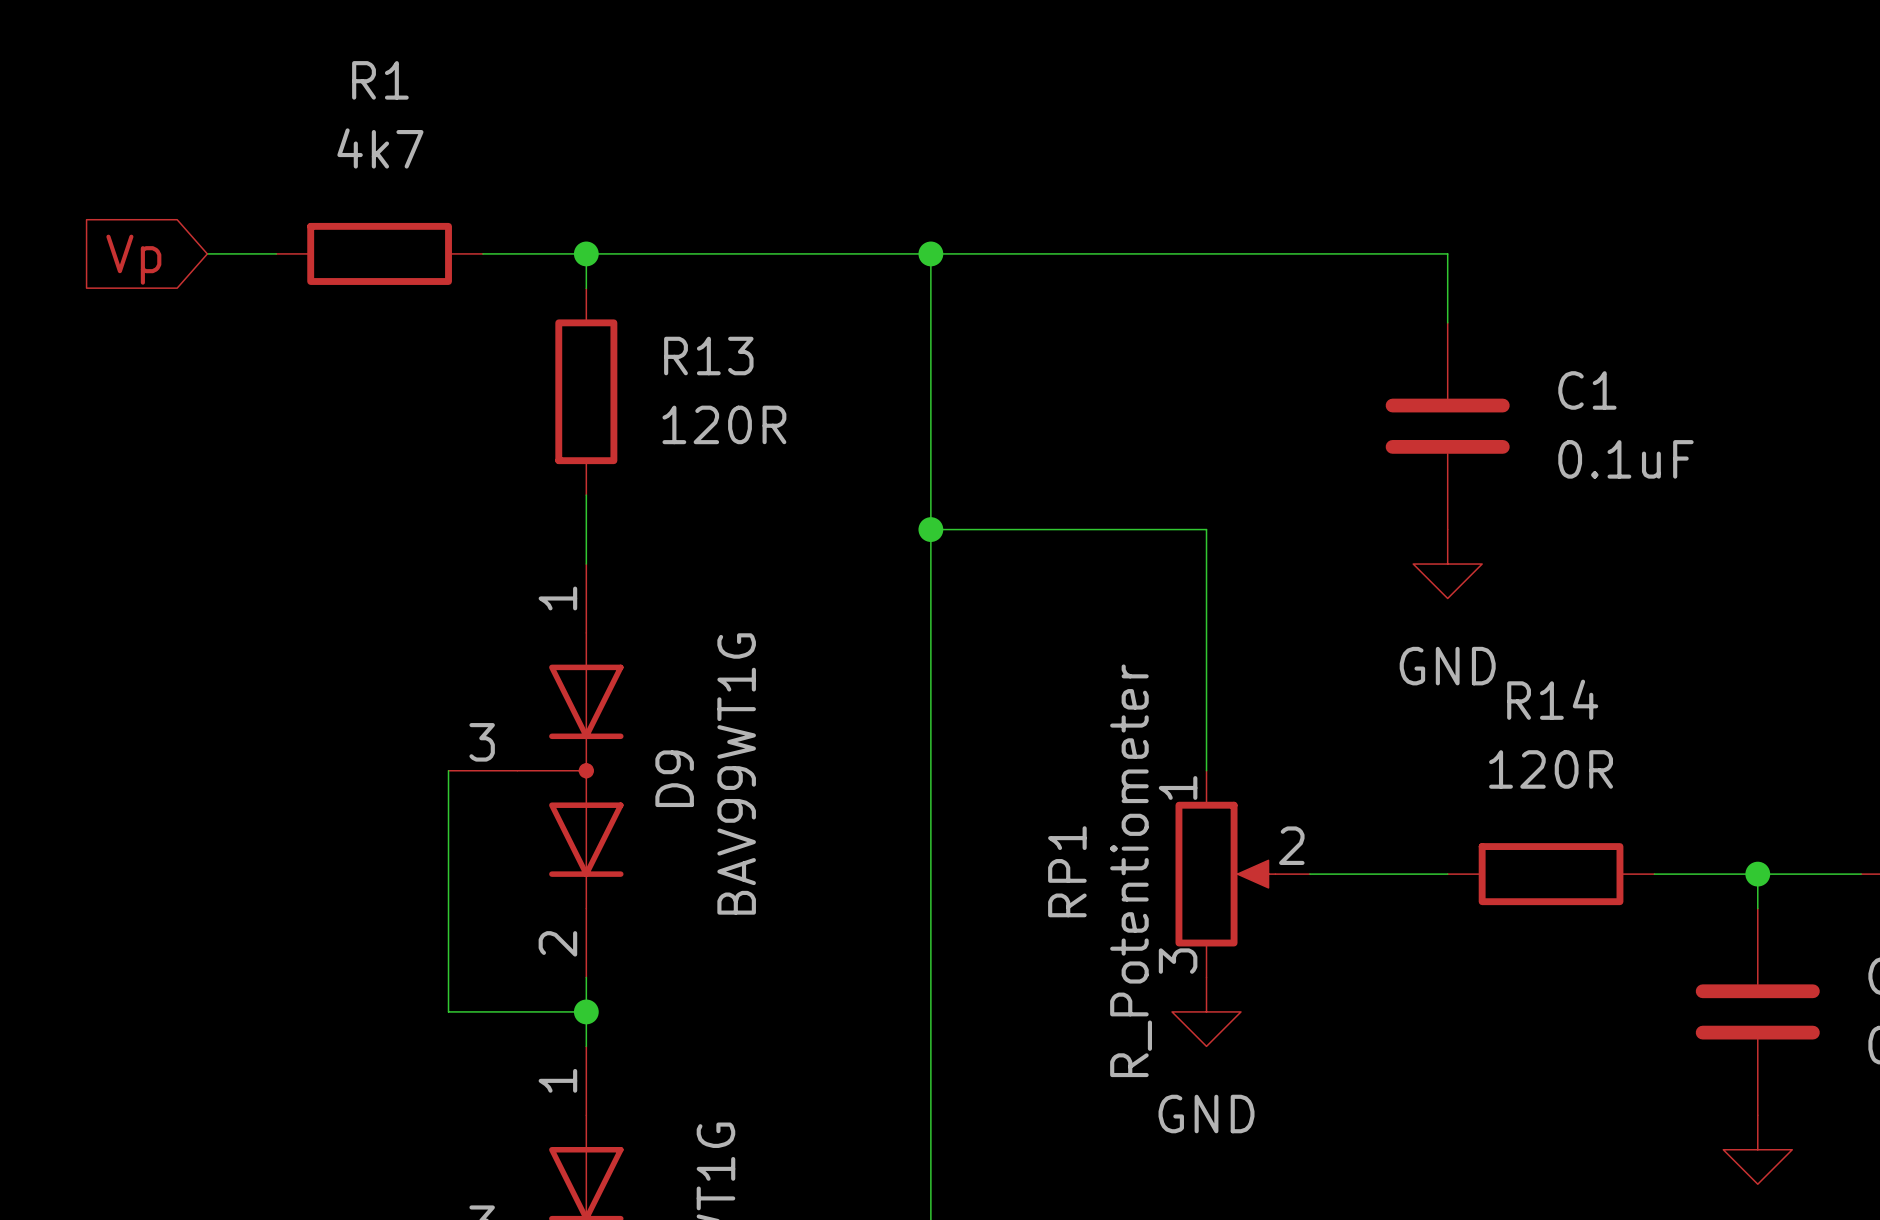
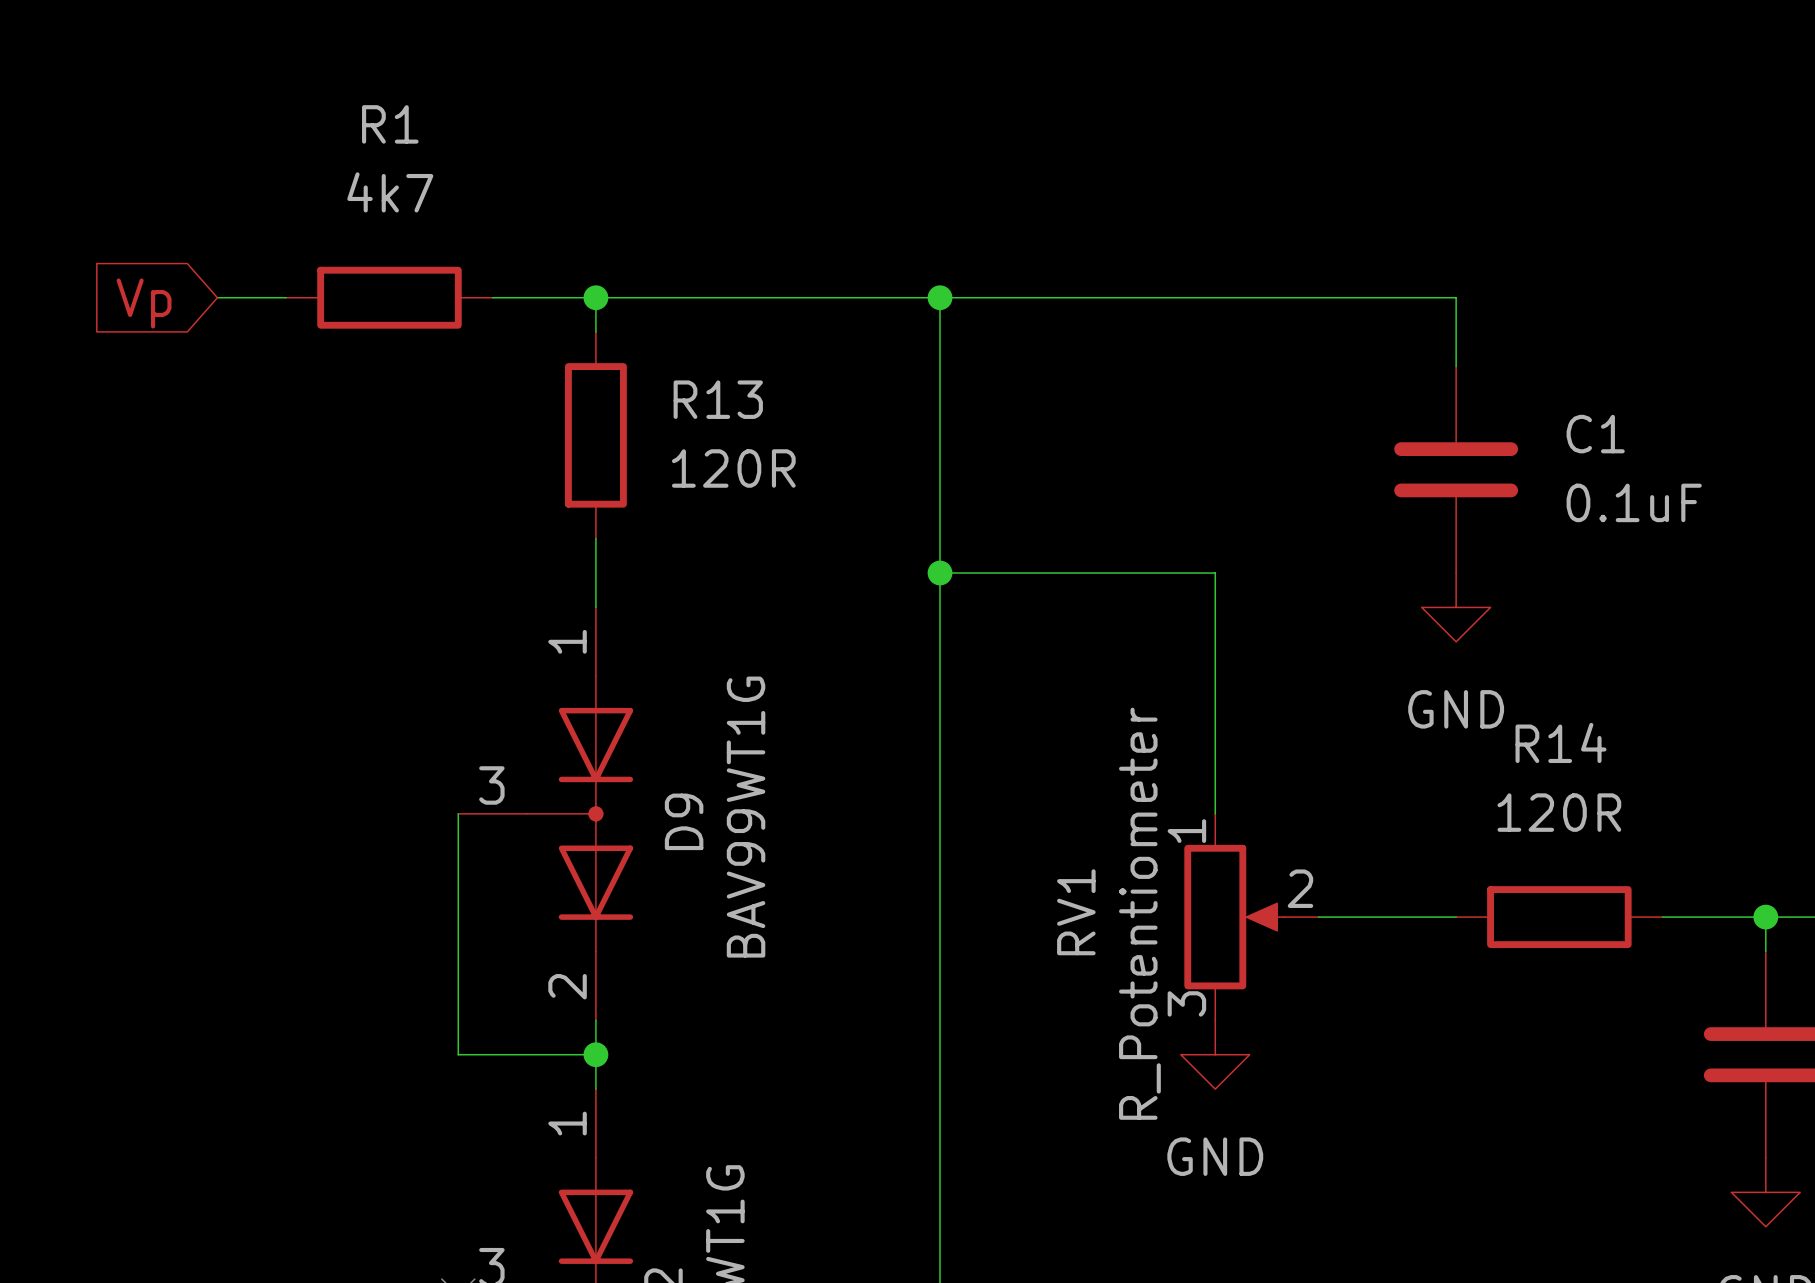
RP1 name: RP1 (1067, 871) -> RV1 (1076, 912)

